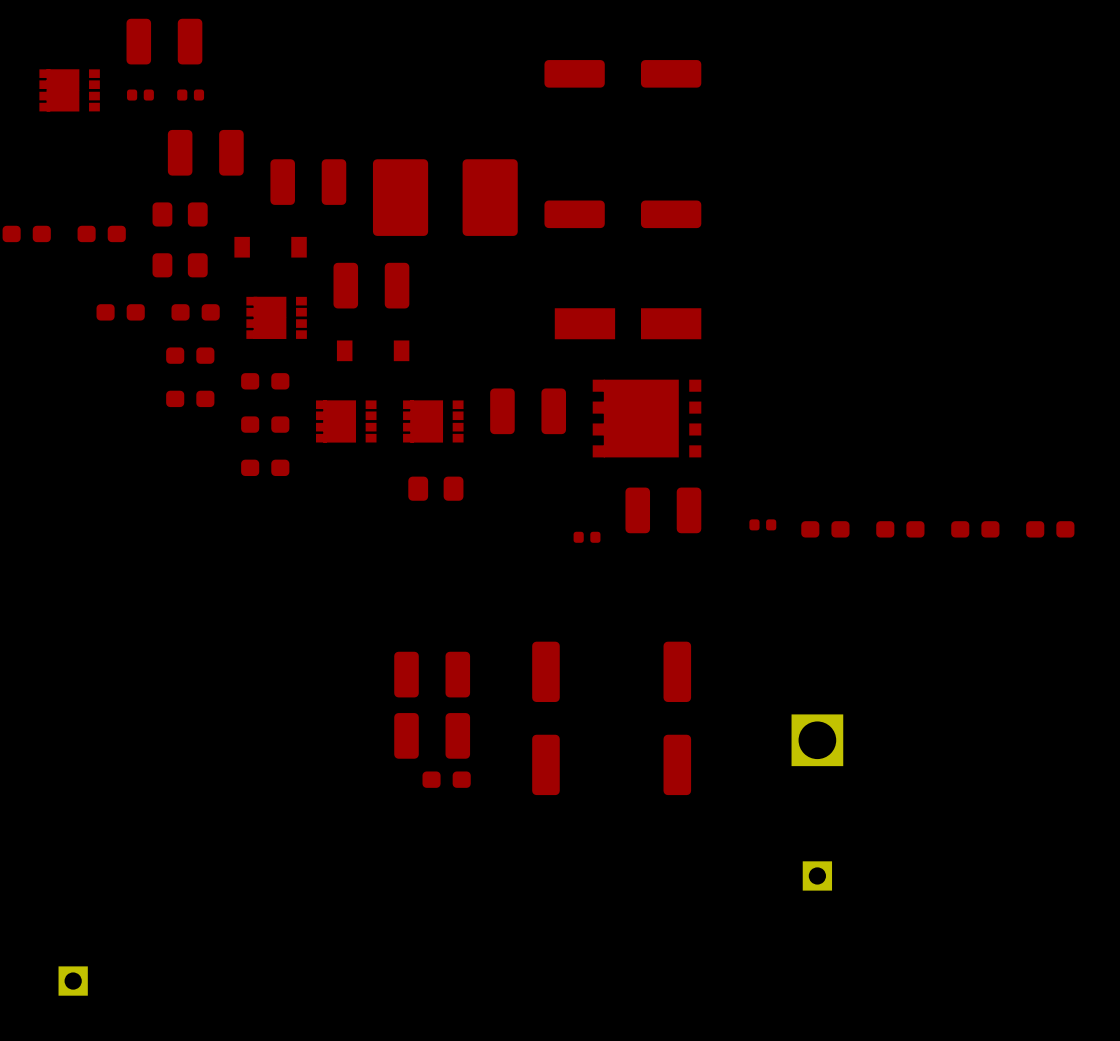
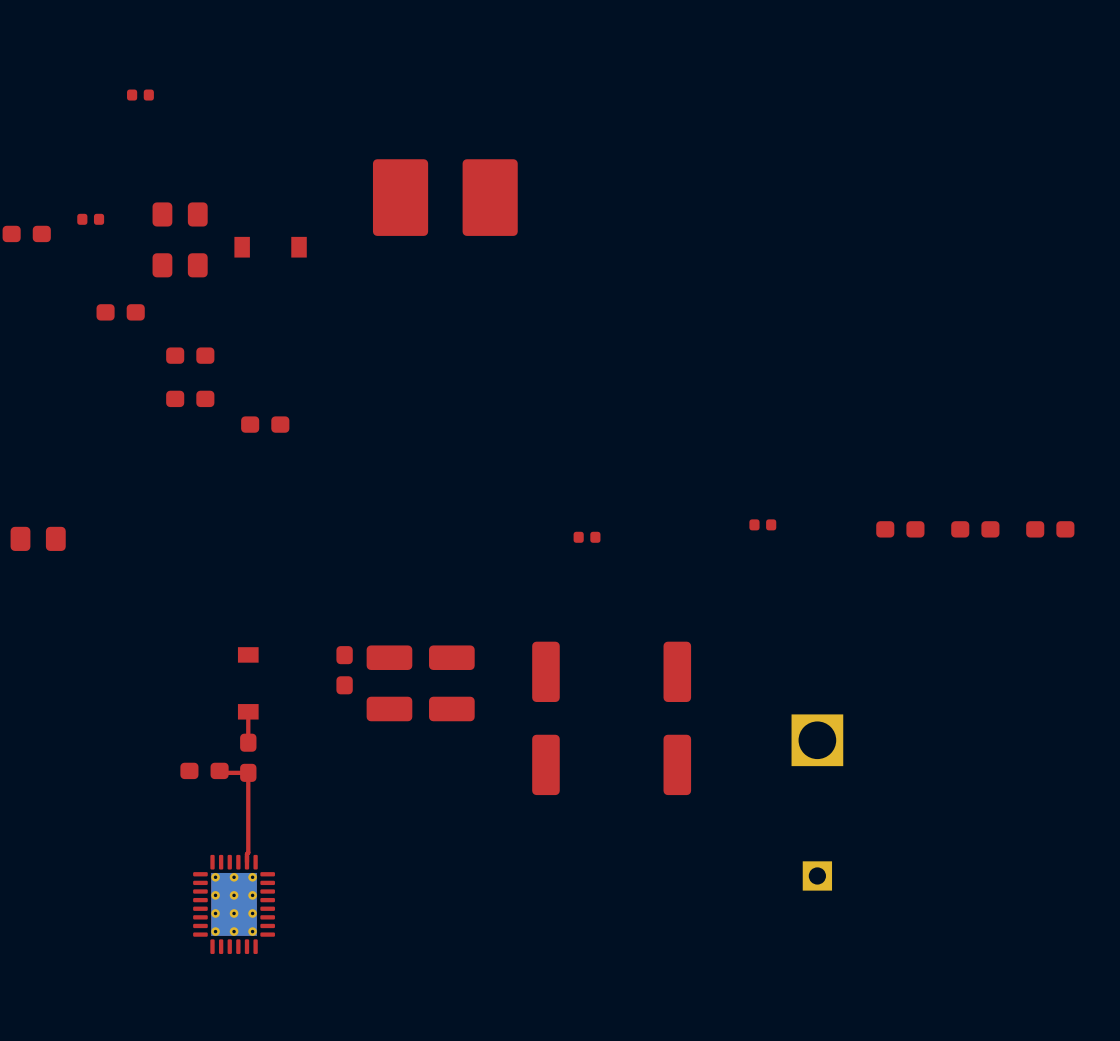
part: (164, 41) -> none
part: (622, 73) -> none
part: (69, 90) -> none
part position: (190, 95) -> (90, 219)
part: (205, 152) -> none
part: (308, 182) -> none
part: (622, 214) -> none
part: (101, 233) -> none
part: (371, 285) -> none
part: (195, 312) -> none
part: (276, 317) -> none
part: (628, 323) -> none
part rotation: 0° (373, 350) -> 90° clockwise (248, 683)
part position: (373, 350) -> (248, 683)
part: (265, 381) -> none
part: (528, 411) -> none
part: (647, 418) -> none
part: (346, 421) -> none
part: (433, 421) -> none
part: (265, 467) -> none
part position: (435, 488) -> (38, 538)
part: (663, 510) -> none
part: (825, 529) -> none
part: none -> (344, 670)
part rotation: 0° (432, 674) -> 90° clockwise (451, 683)
part: none -> (389, 683)
top track: none -> (248, 711) (248, 742)
part: (432, 735) -> none
part: none -> (248, 757)
part: none -> (204, 770)
top track: none -> (219, 770) (221, 772) (248, 772) (246, 862)
part: (446, 779) -> none
part: none -> (234, 904)
part: (73, 981) -> none

